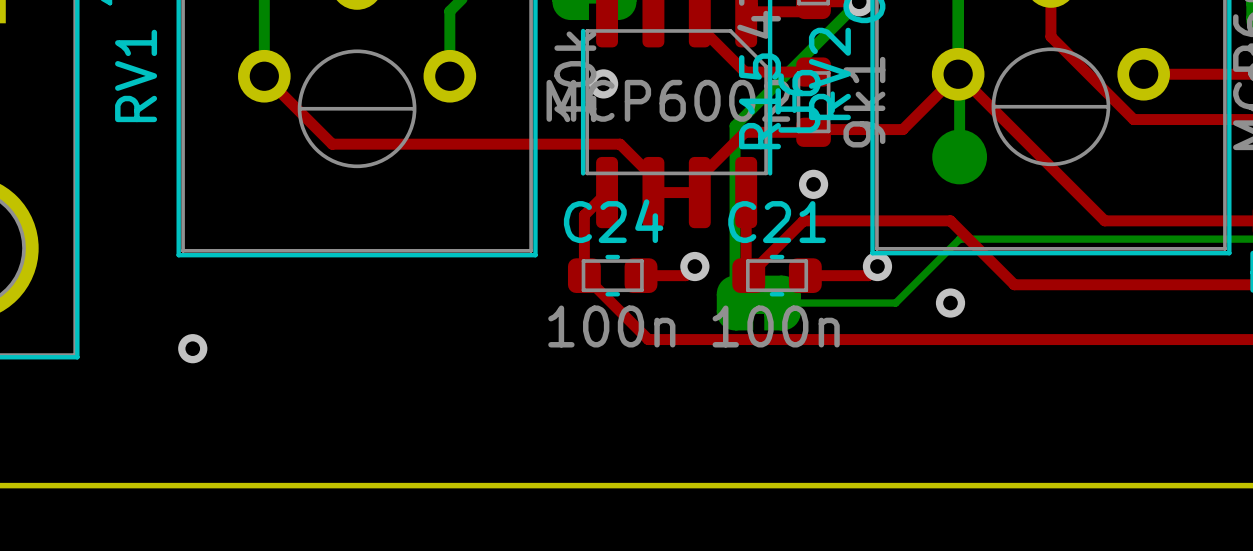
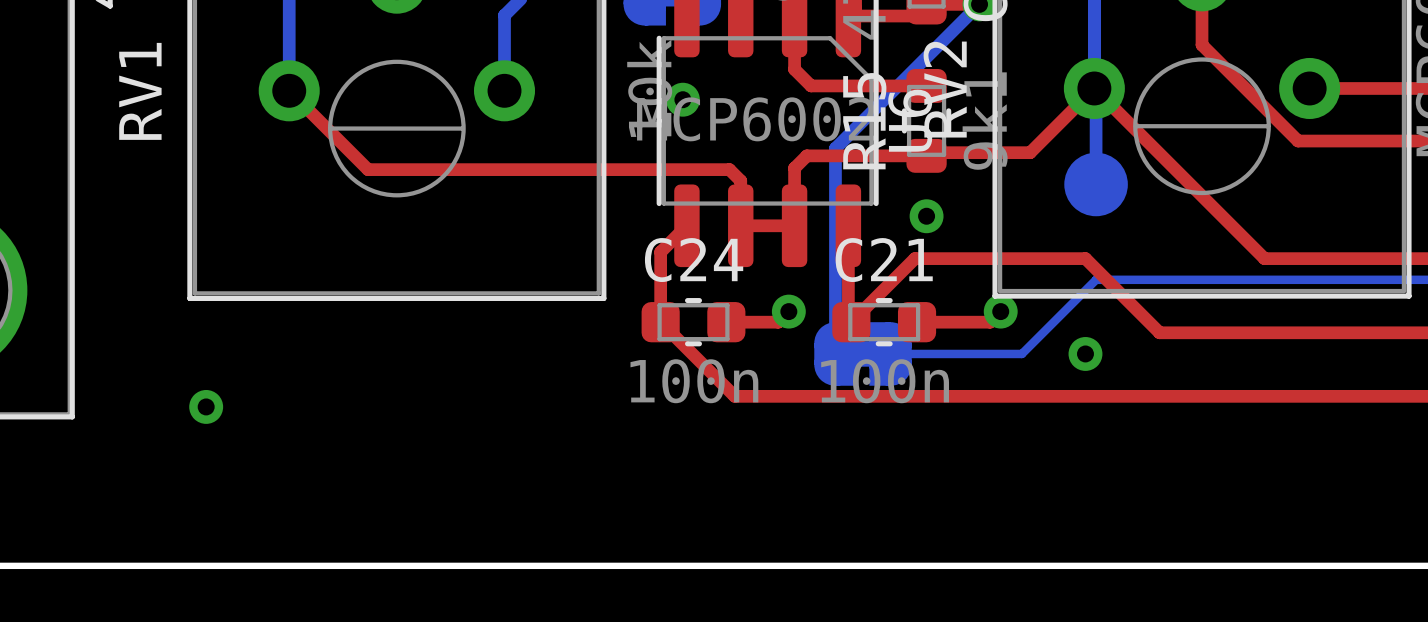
top track: (699, 26) (745, 72) -> (794, 33) (794, 69) (811, 85) (847, 85)
top track: (745, 132) (699, 177) -> (847, 155) (806, 155) (794, 168) (794, 208)
top track: (620, 144) (653, 177) -> (702, 169) (729, 169) (740, 180) (740, 208)

